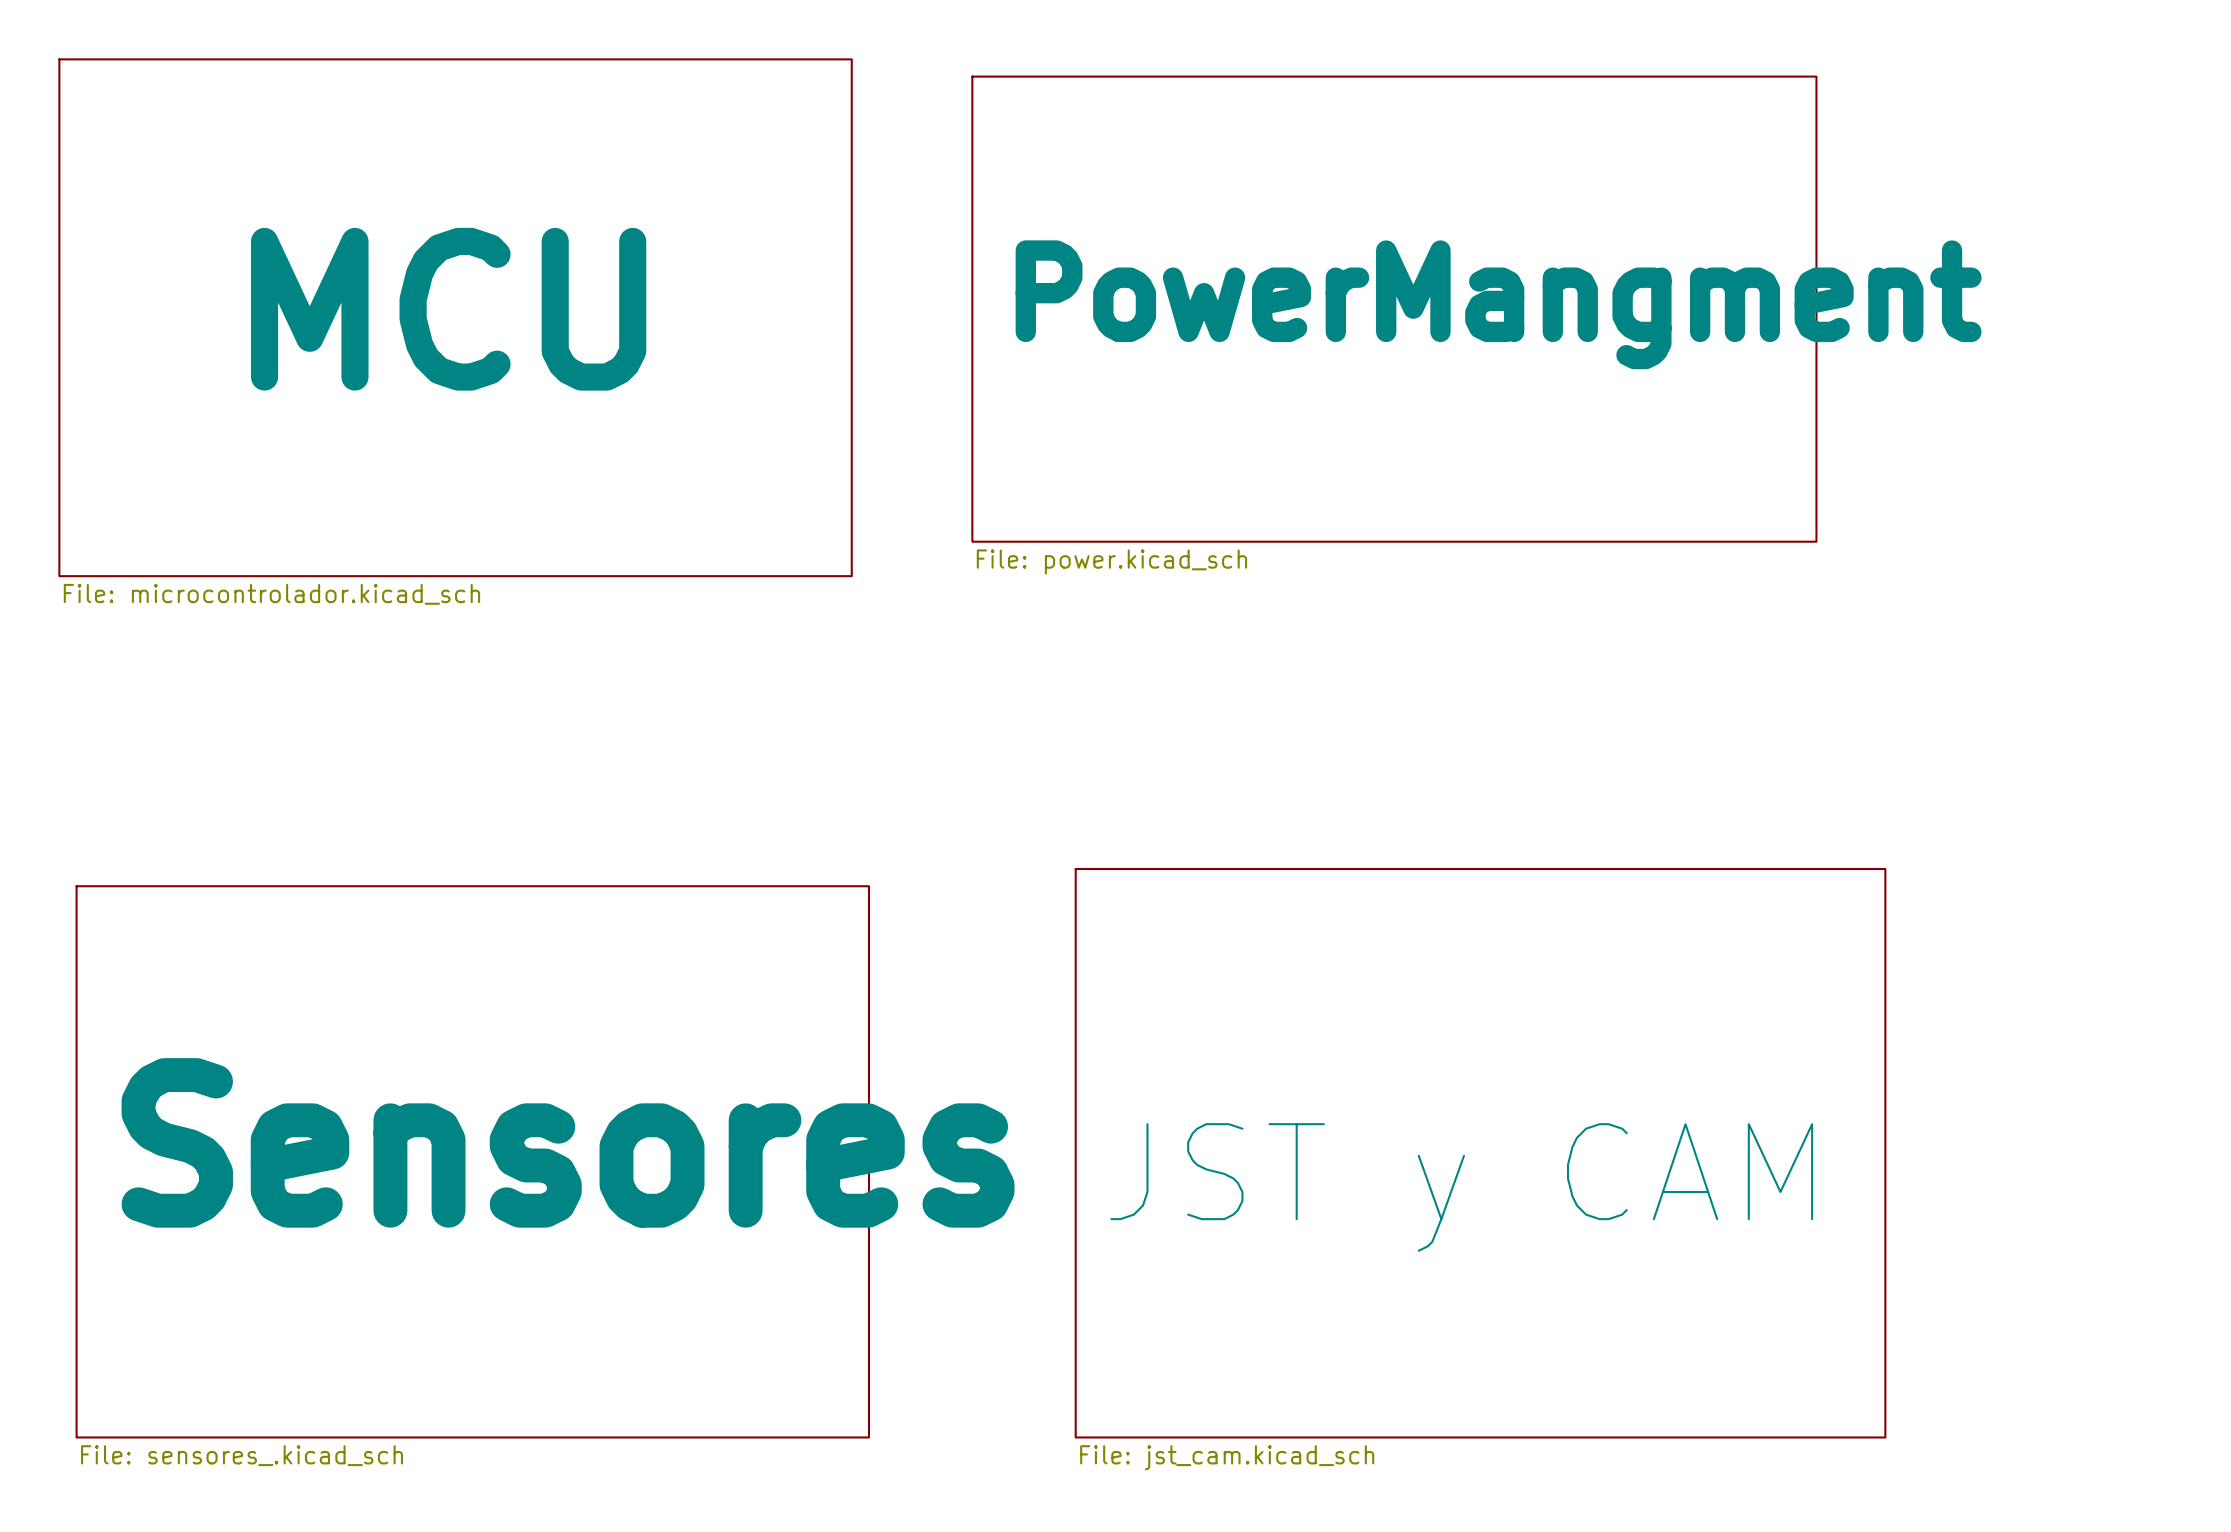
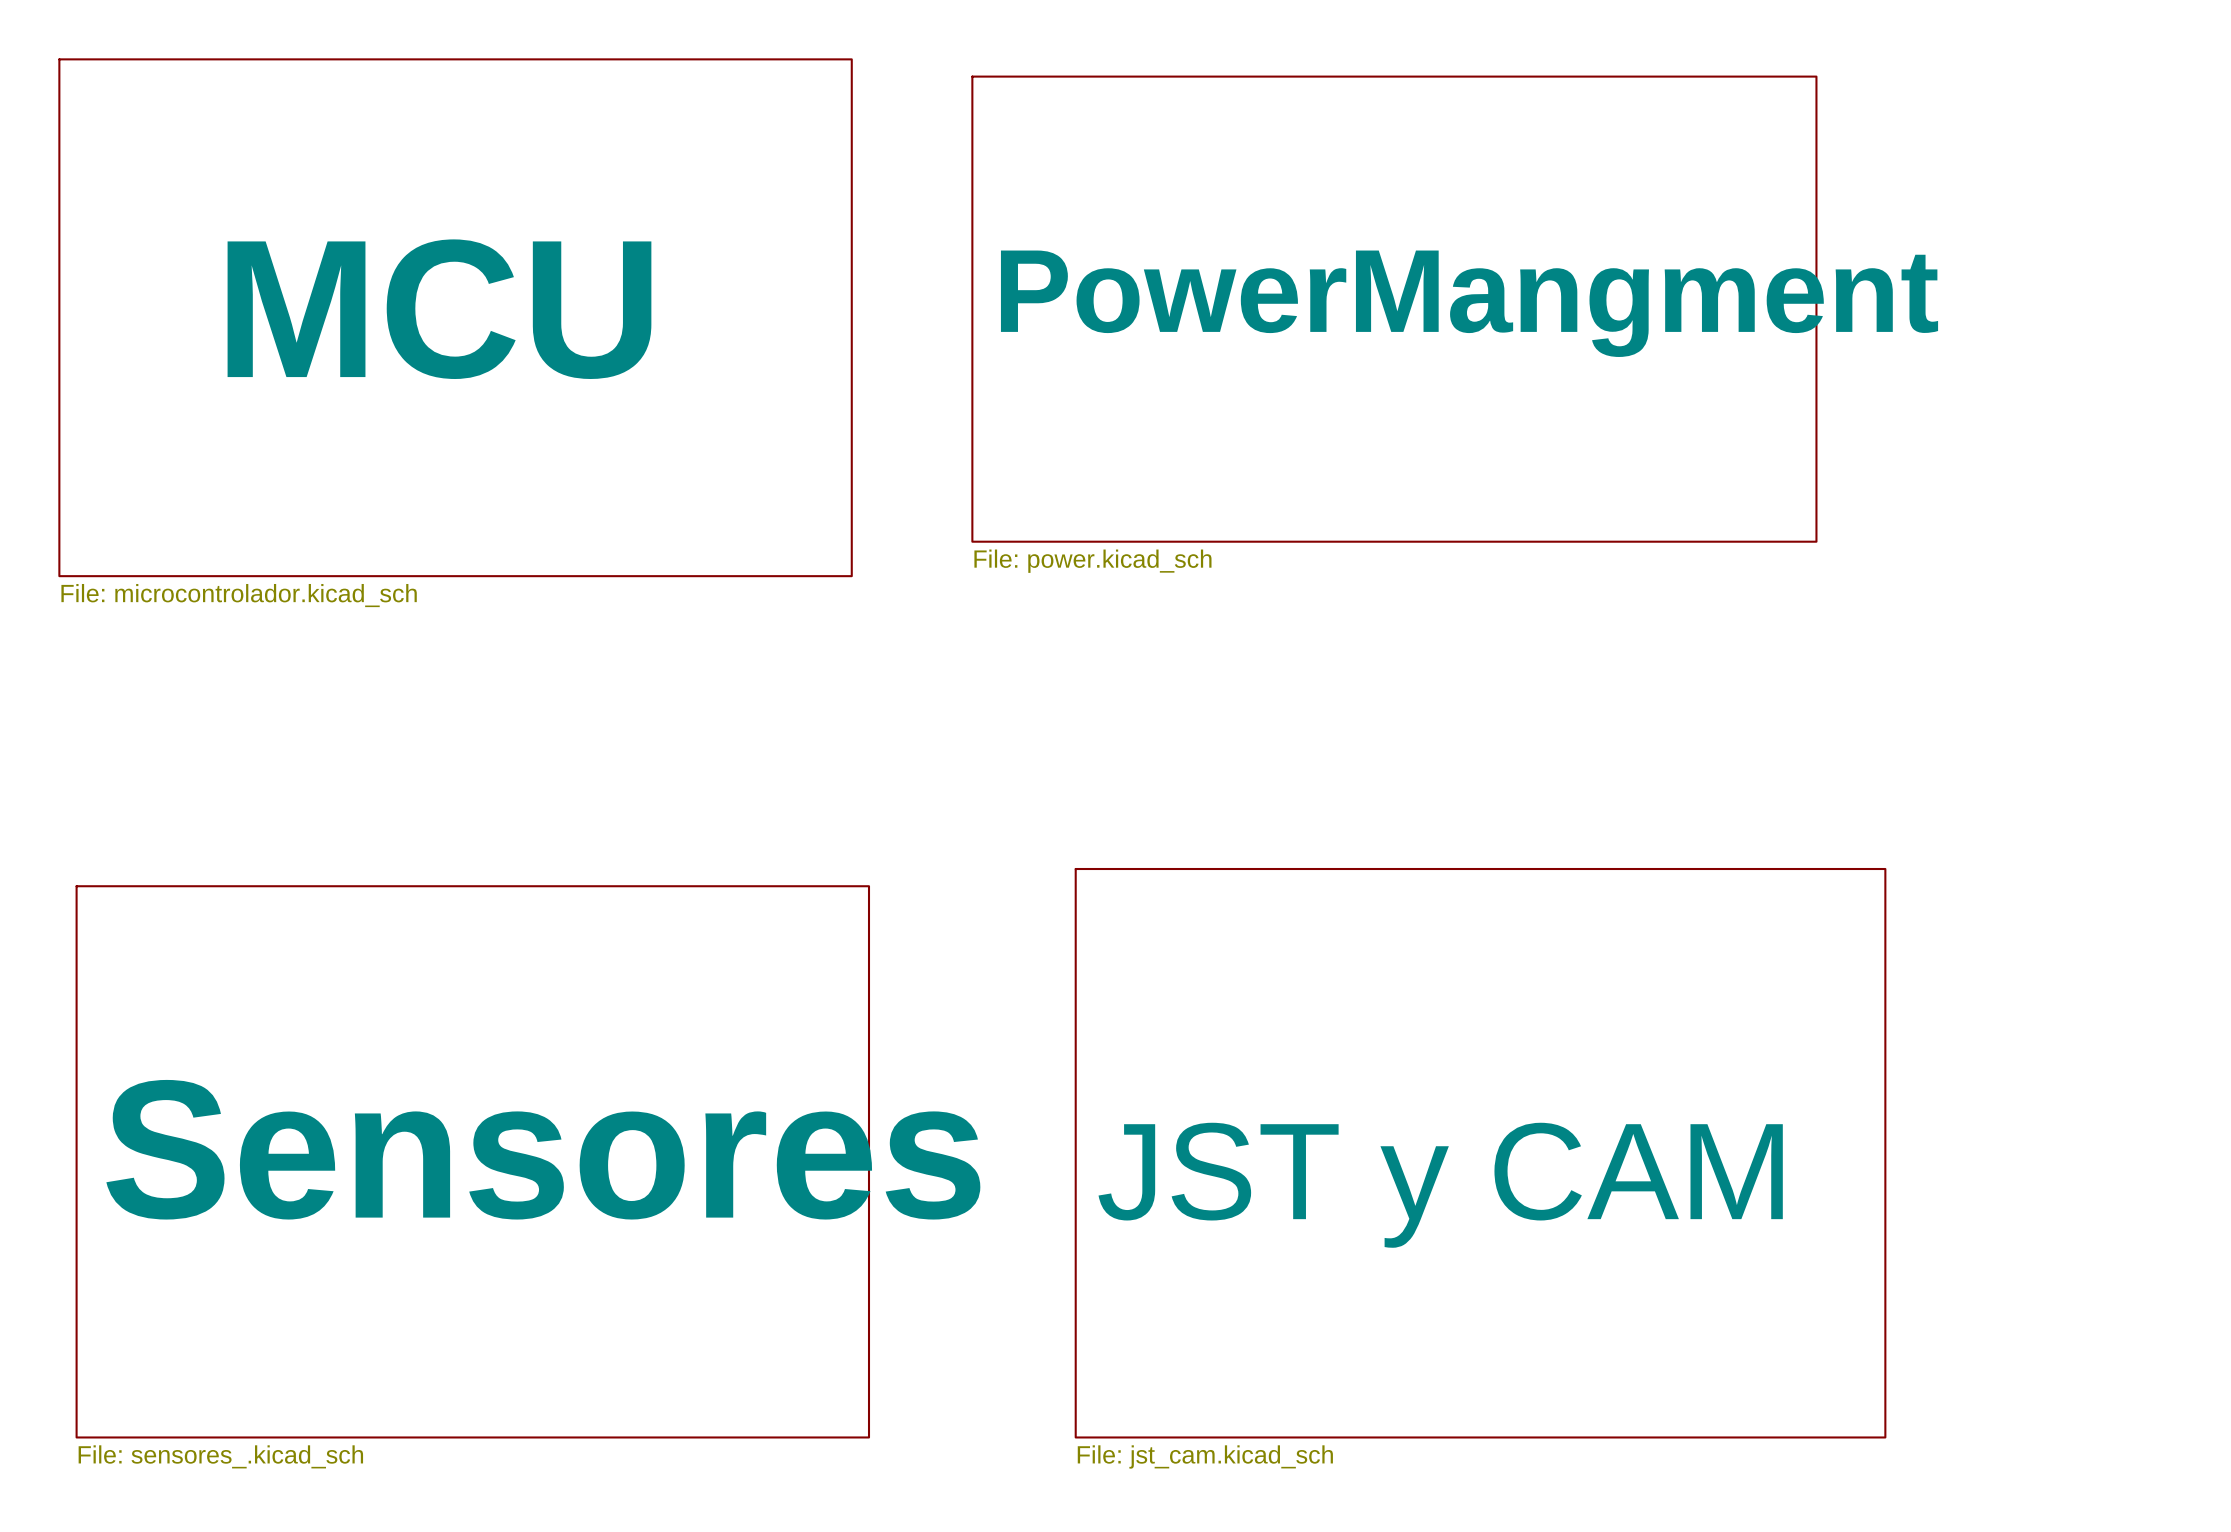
sheet Sensores name position: Sensores (568, 1142) -> Sensores (543, 1149)

